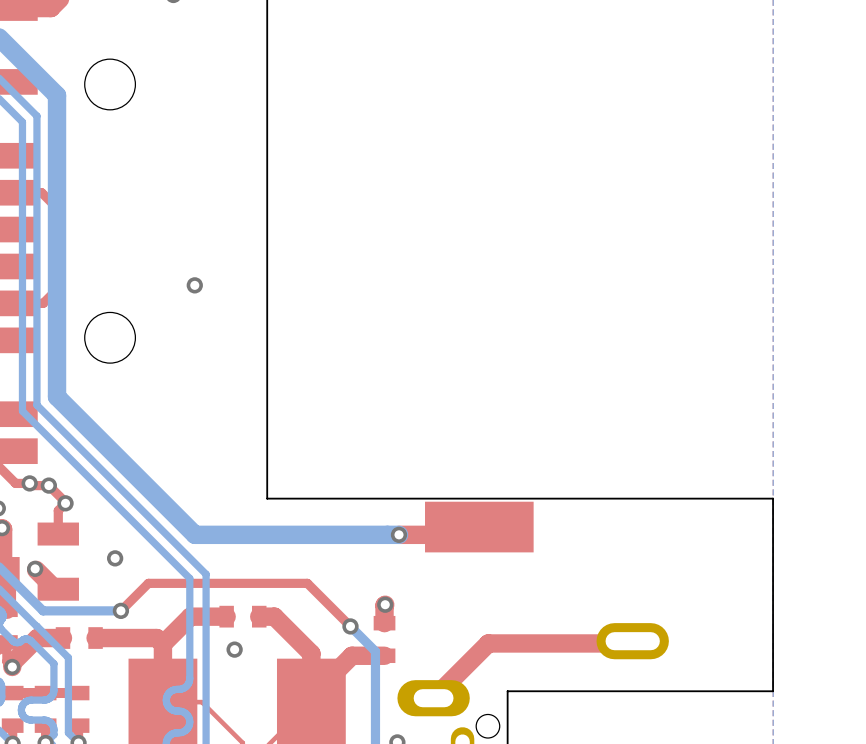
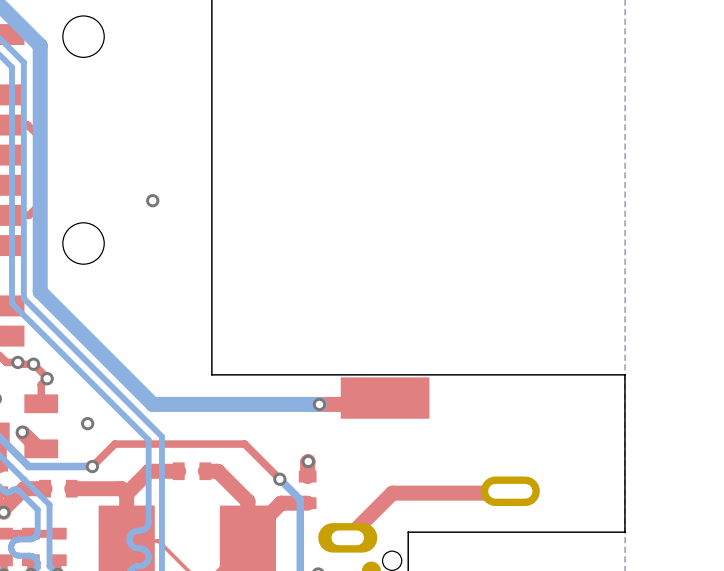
via: (234, 649) -> none

